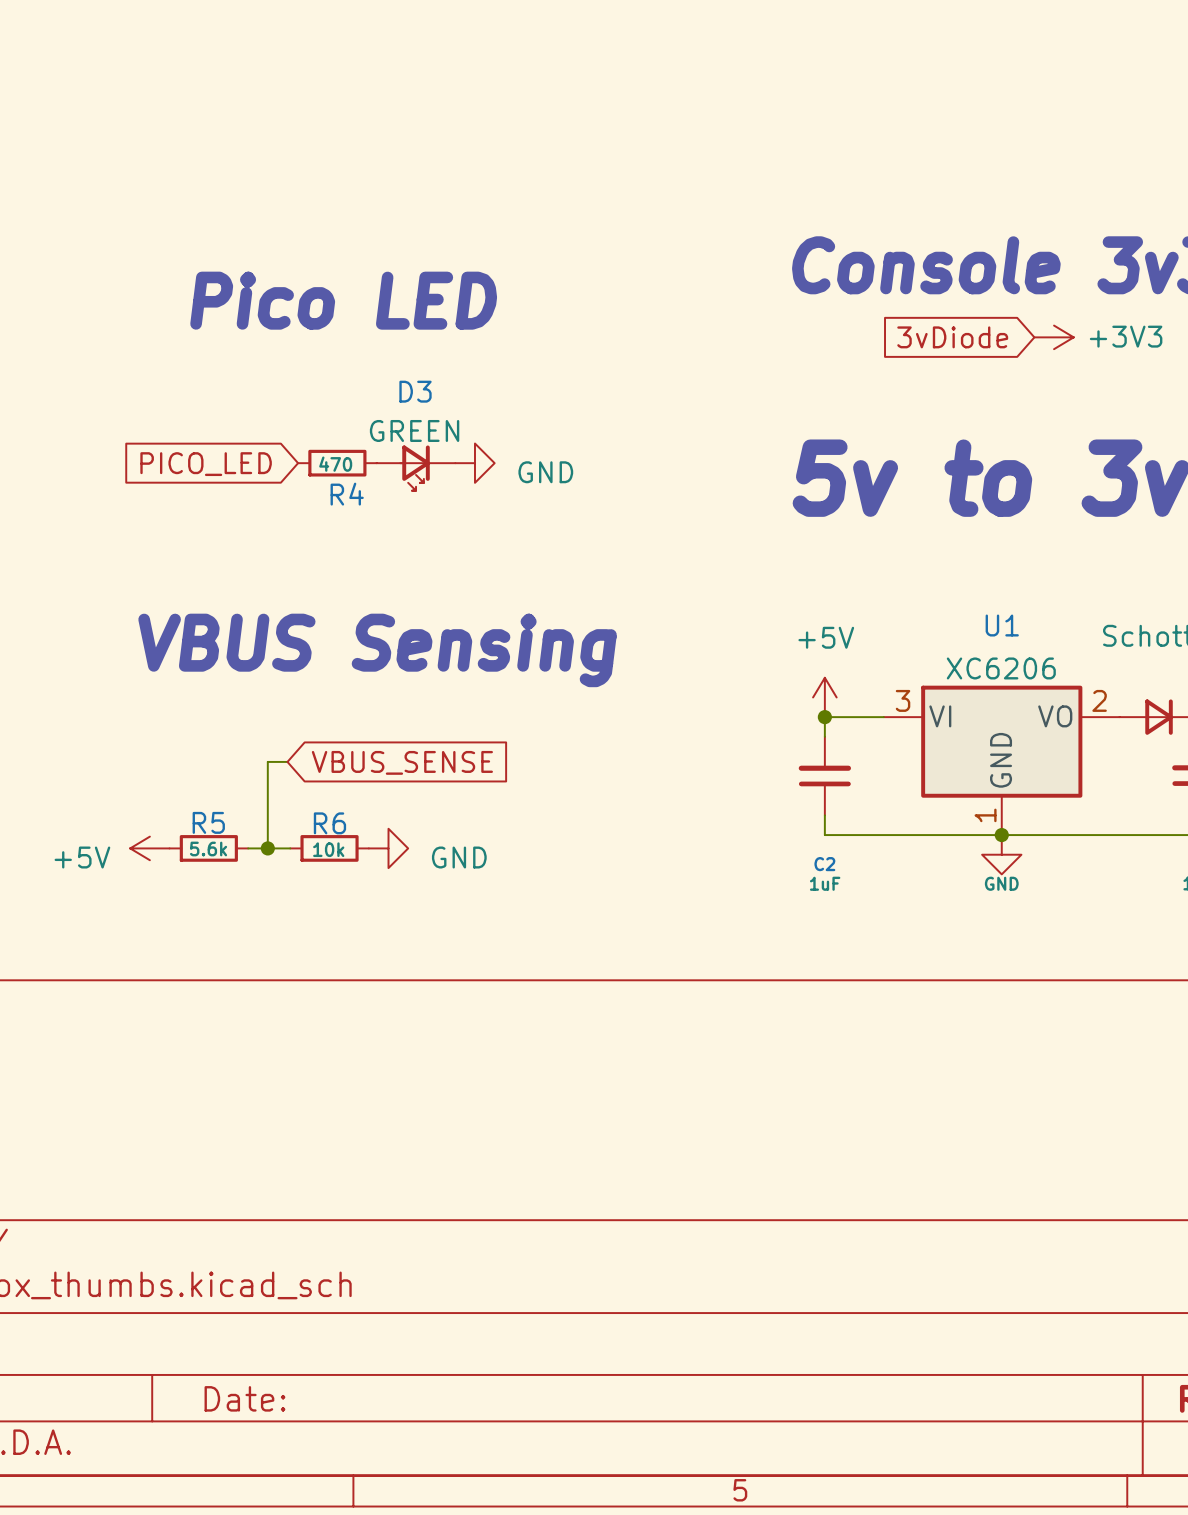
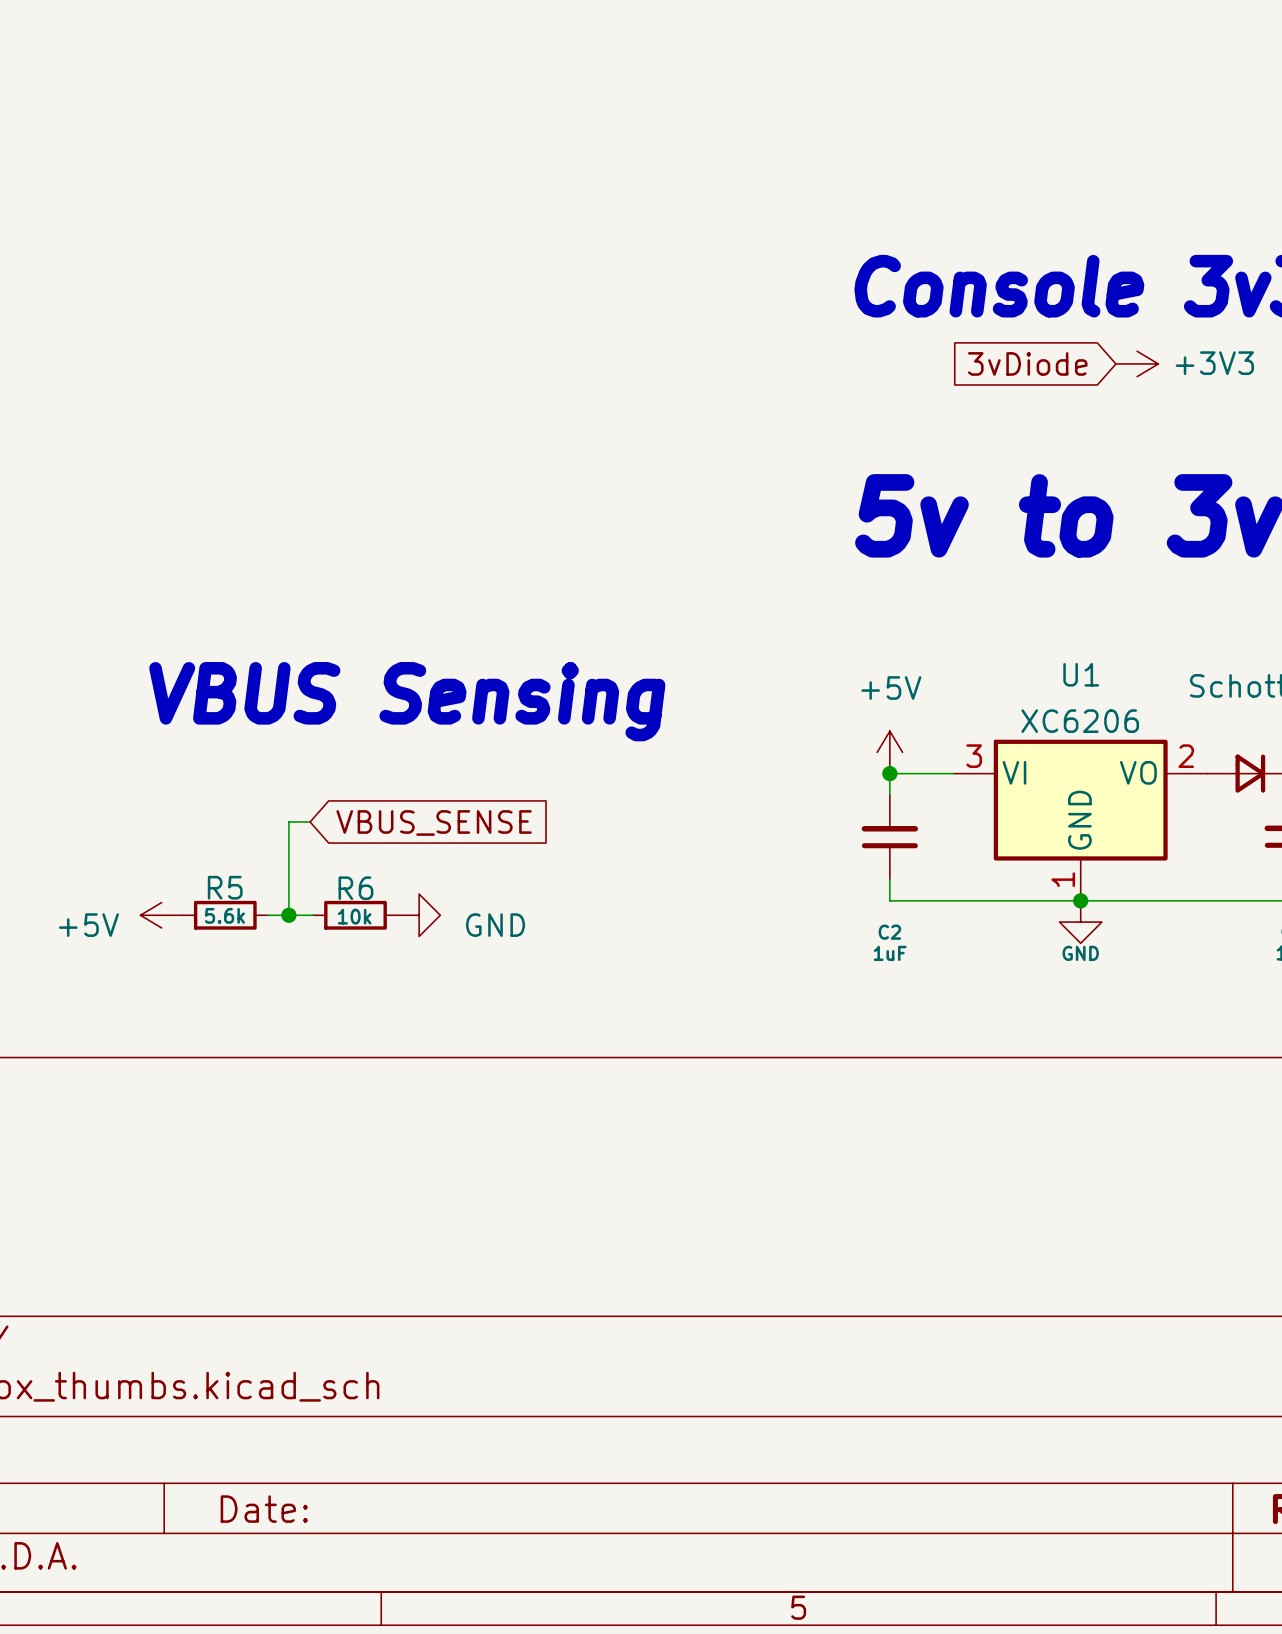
text: Pico LED (343, 300) -> none
R4: 470 (337, 463) -> none
power symbol: GND (474, 463) -> none
global label: PICO_LED (206, 464) -> none
D3: GREEN (416, 468) -> none

